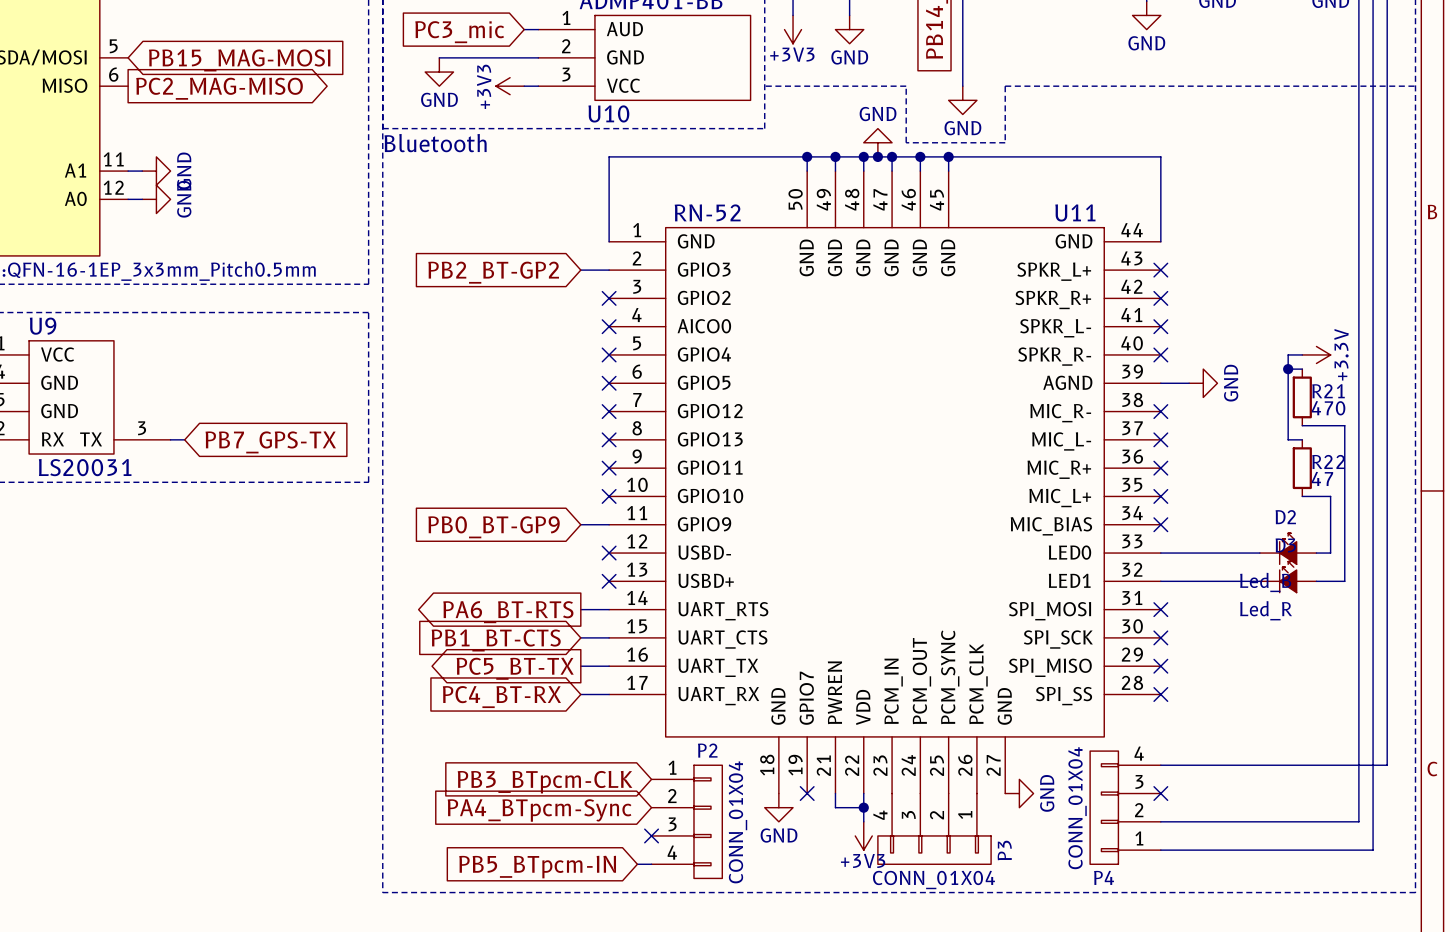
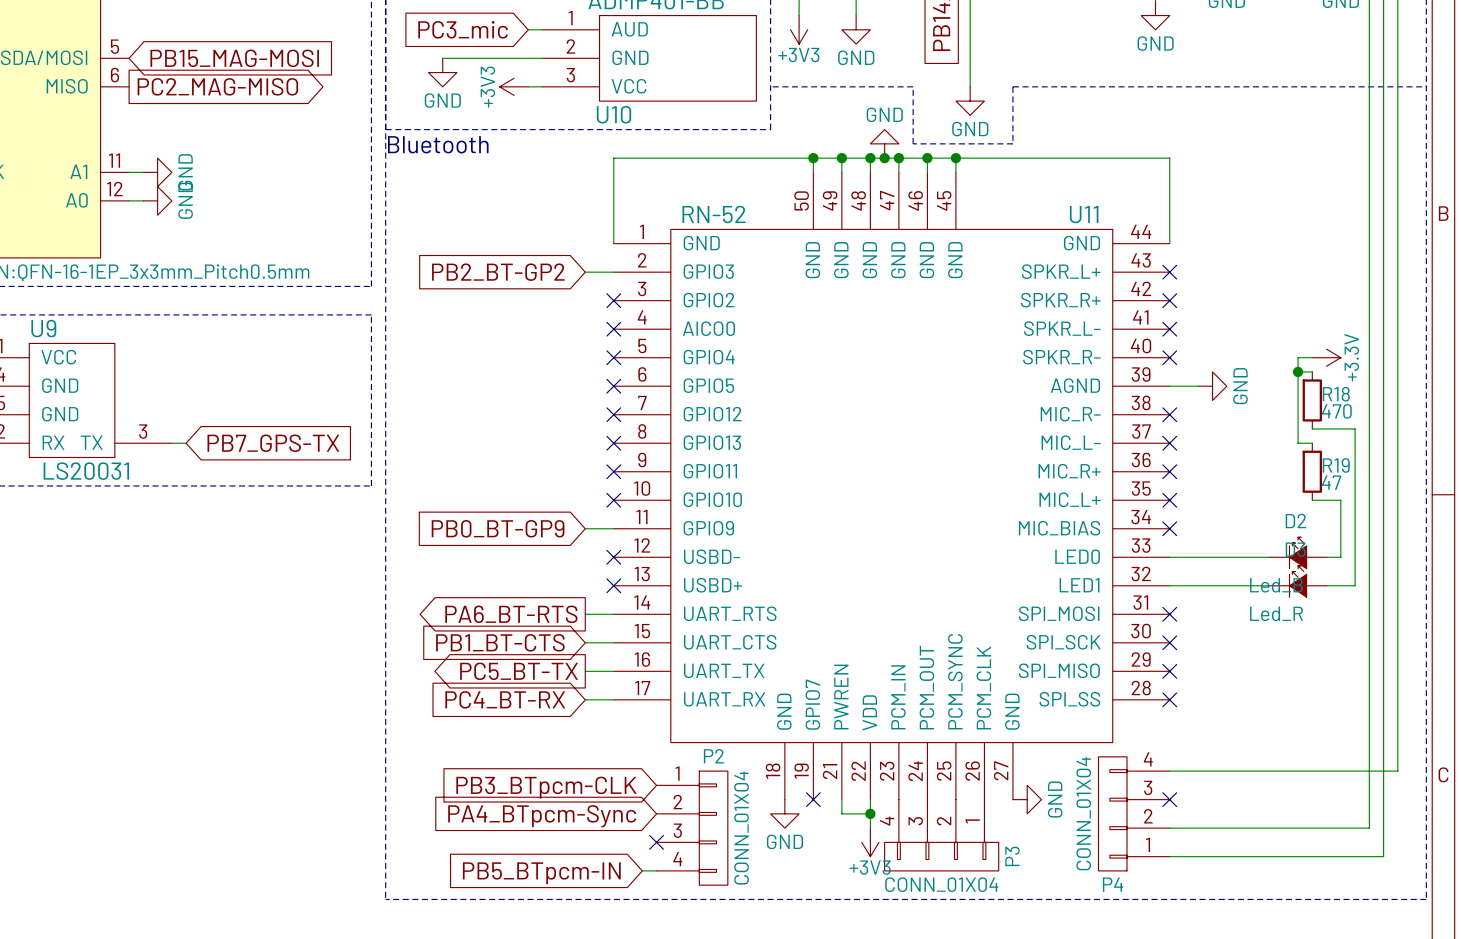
R21 name: R21 (1328, 391) -> R18 (1336, 394)
R22 name: R22 (1328, 461) -> R19 (1336, 465)

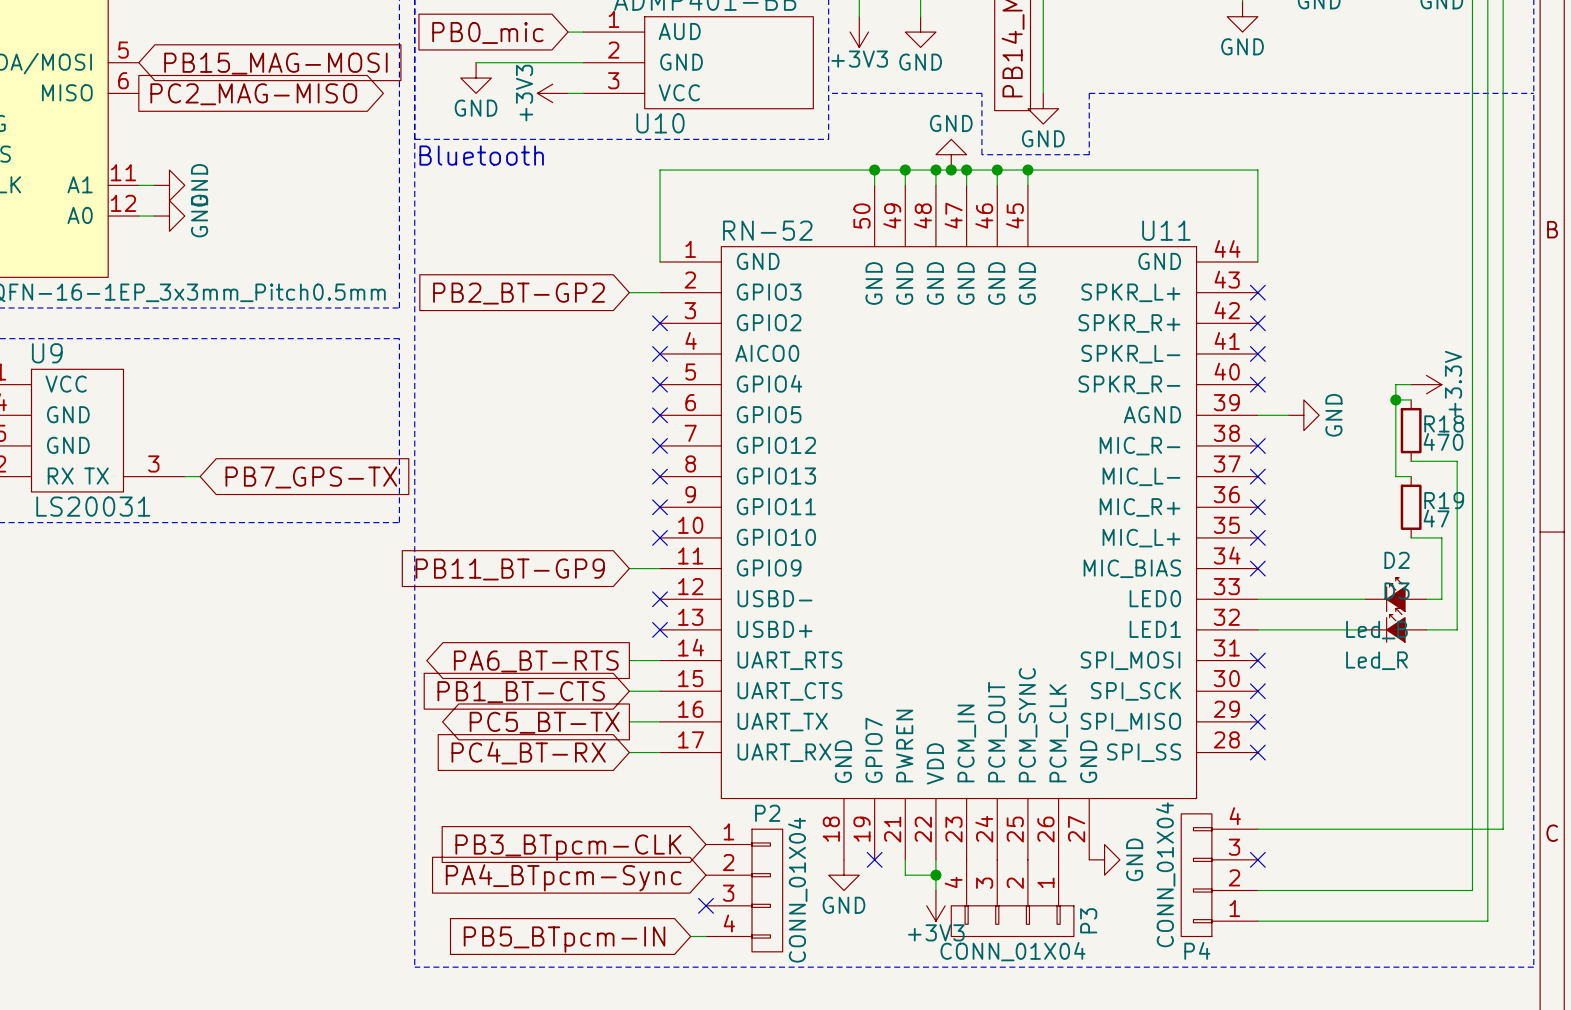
global label: PC3_mic (463, 29) -> PB0_mic (487, 32)
global label: PB0_BT-GP9 (498, 528) -> PB11_BT-GP9 (510, 569)

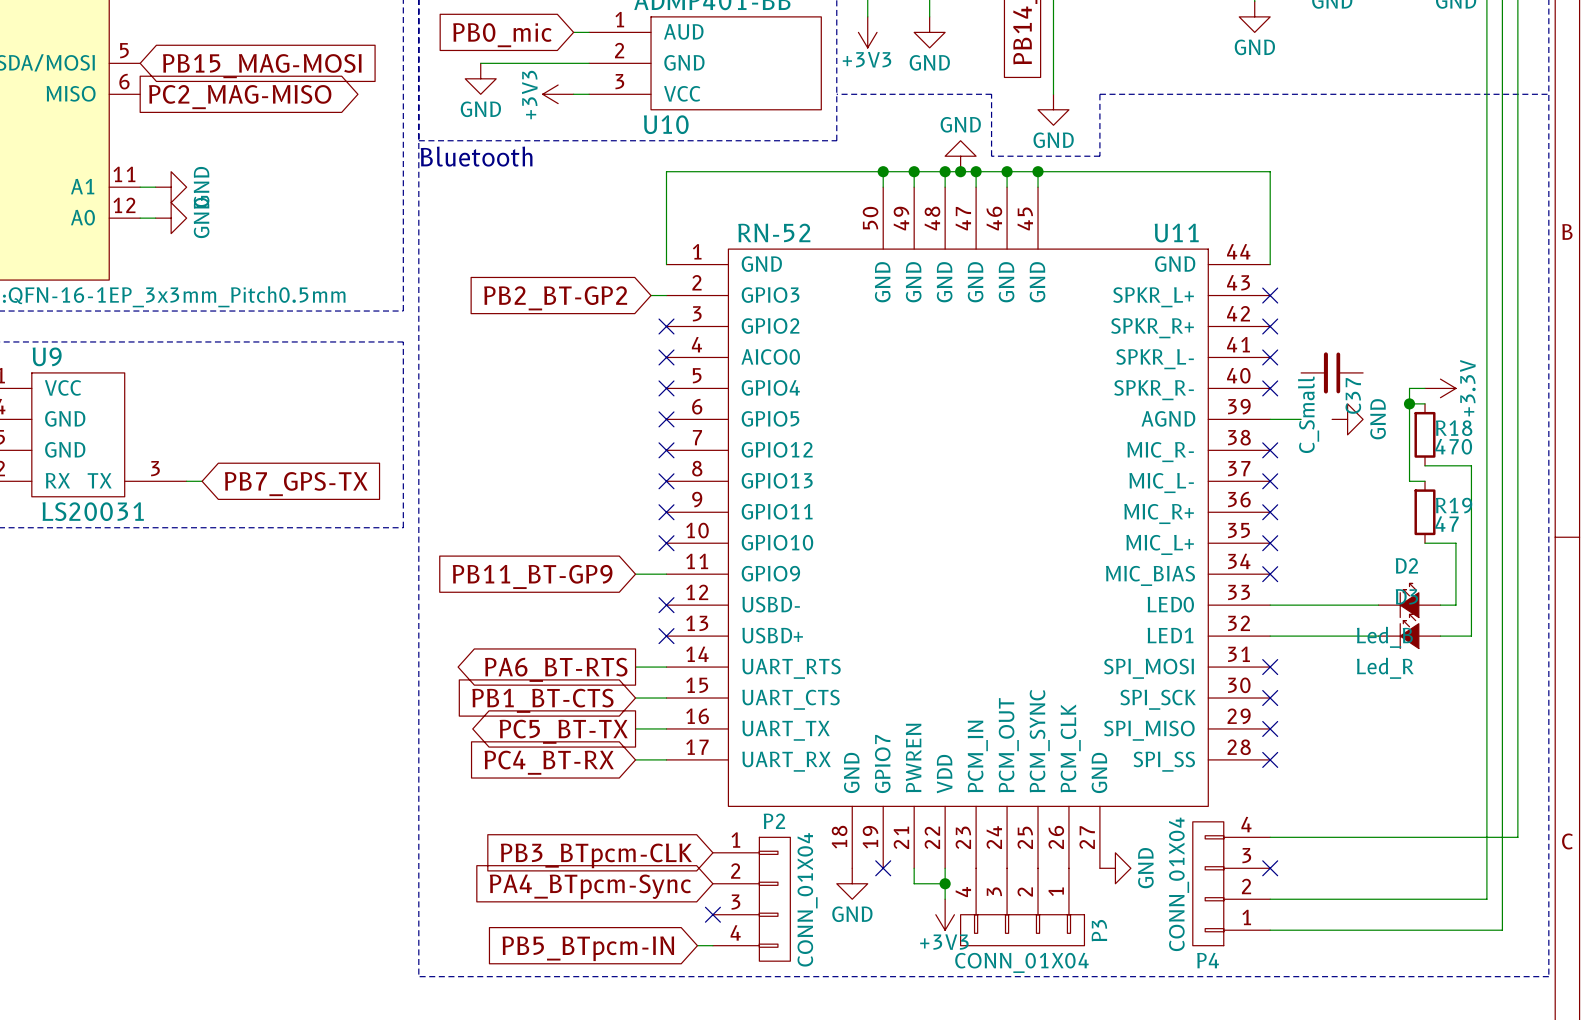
wire: (629, 292) (644, 292) -> none
global label position: PB2_BT-GP2 (518, 293) -> PB2_BT-GP2 (555, 298)
C37: none -> C_Small (1332, 372)
power symbol position: GND (1303, 415) -> GND (1347, 419)

